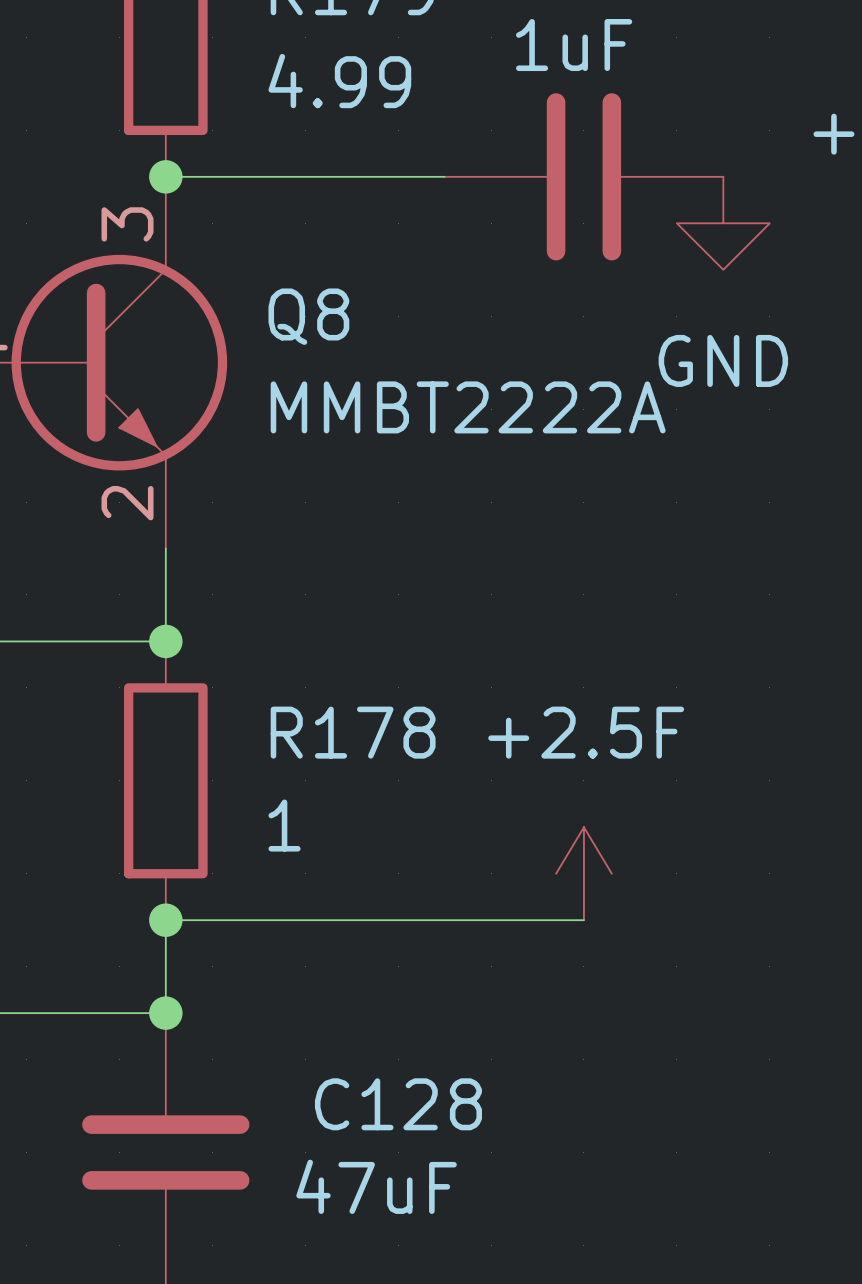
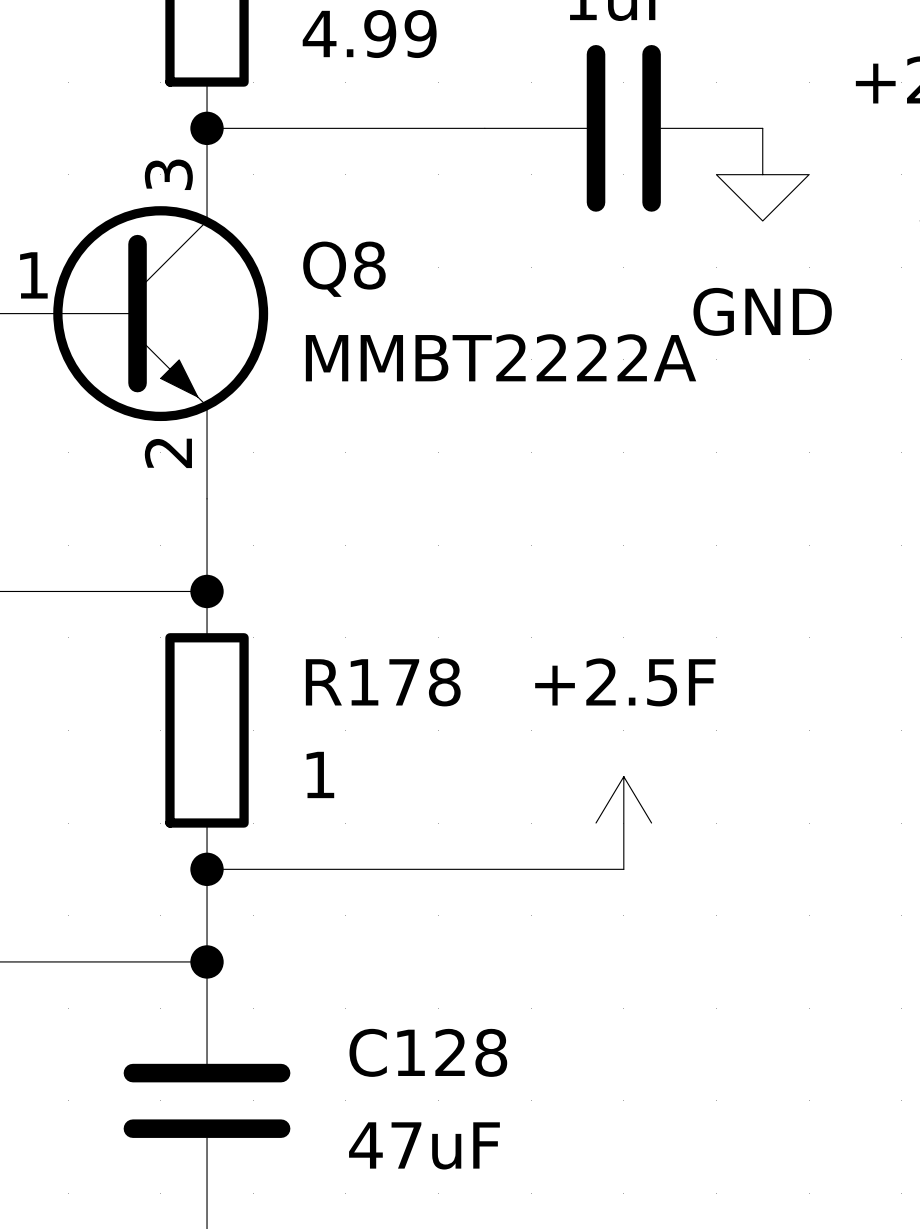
C128 value position: 47uF (376, 1186) -> 47uF (424, 1145)

